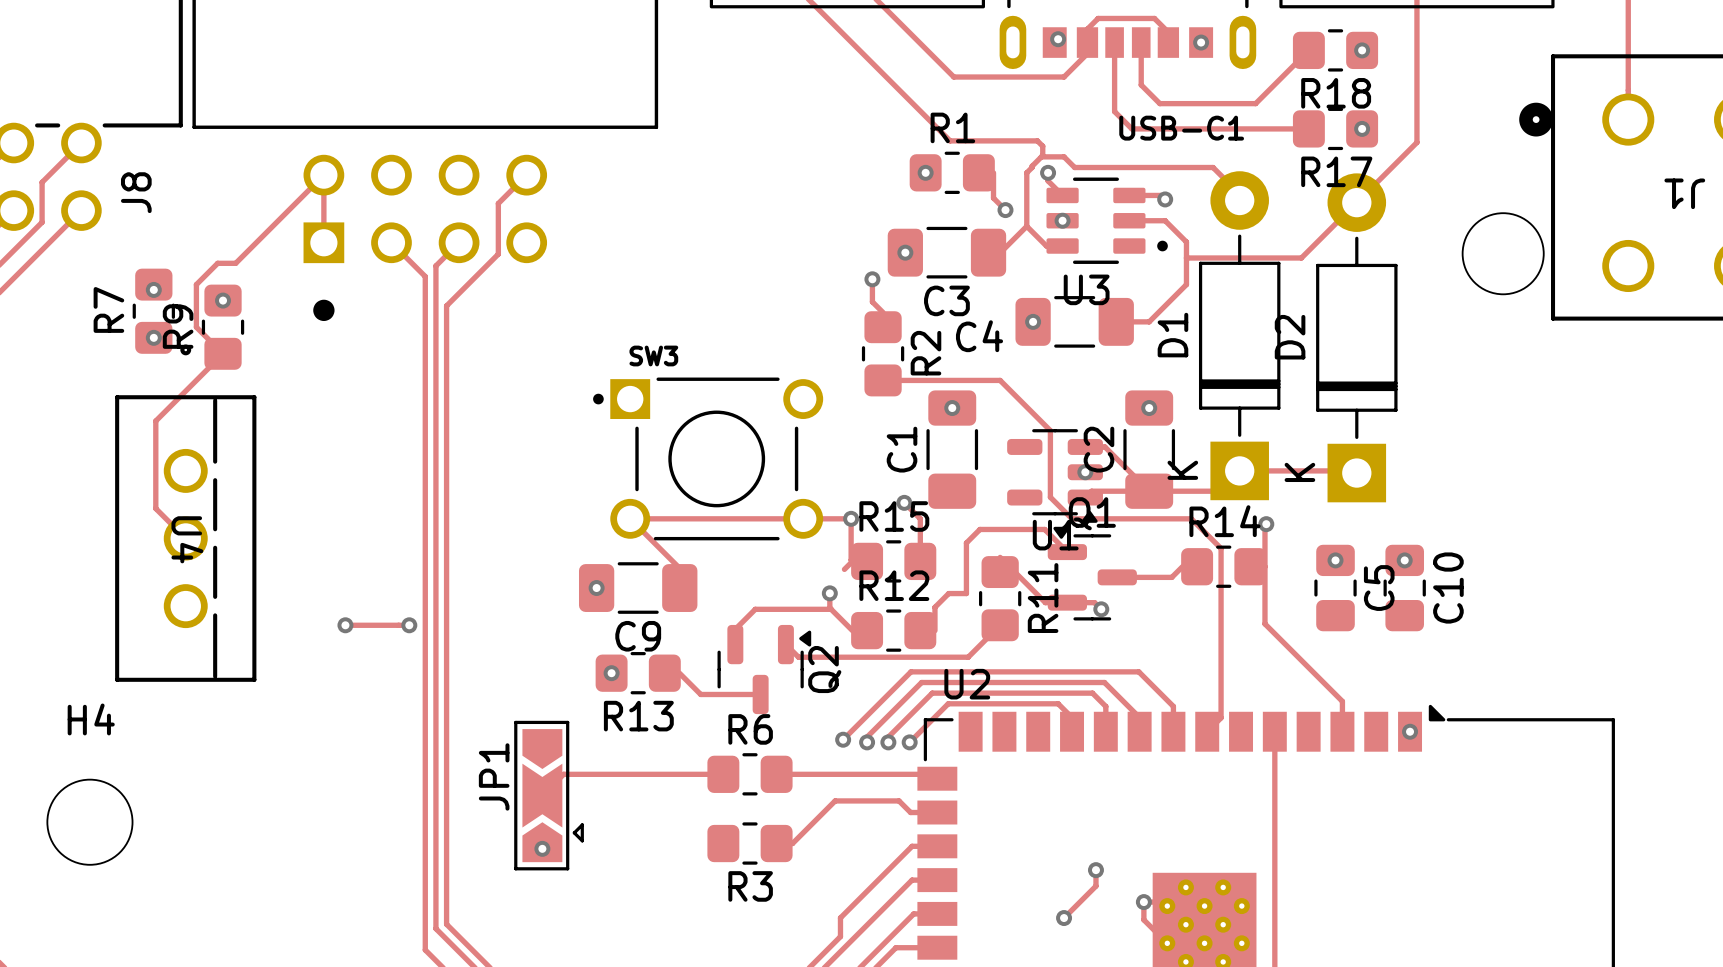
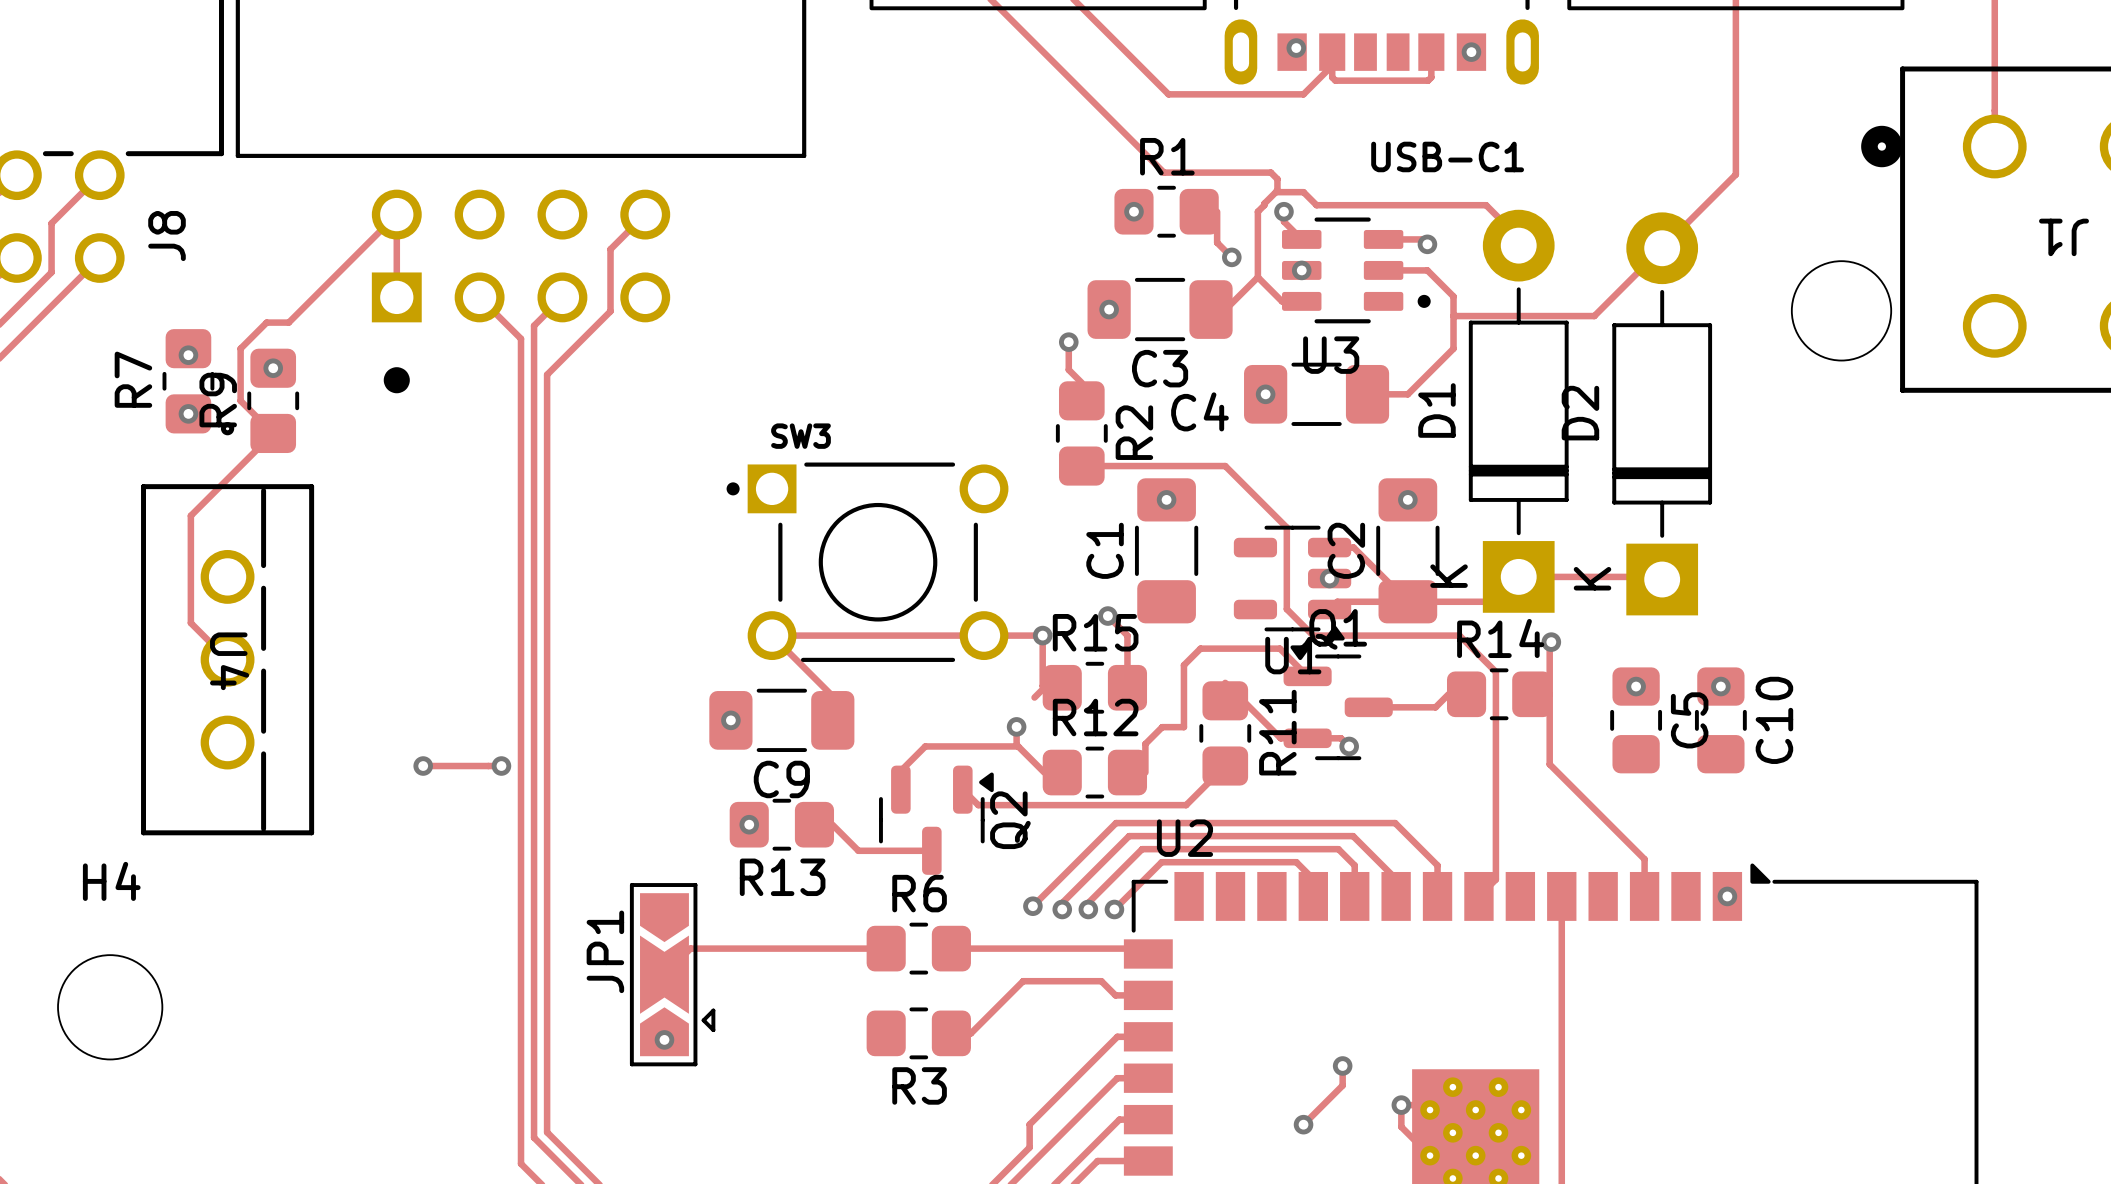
track: (1087, 42) (1087, 29) (1098, 18) (1154, 18) (1168, 32) (1168, 42) -> (1332, 65) (1332, 77) (1335, 80) (1428, 80) (1431, 77) (1431, 52)
track: (1114, 42) (1114, 111) (1131, 128) (1308, 128) -> none
track: (1141, 42) (1141, 85) (1159, 103) (1255, 103) (1308, 50) -> none
R18: (1335, 50) -> none
via: (1362, 50) -> none
R17: (1335, 128) -> none
via: (1362, 128) -> none

